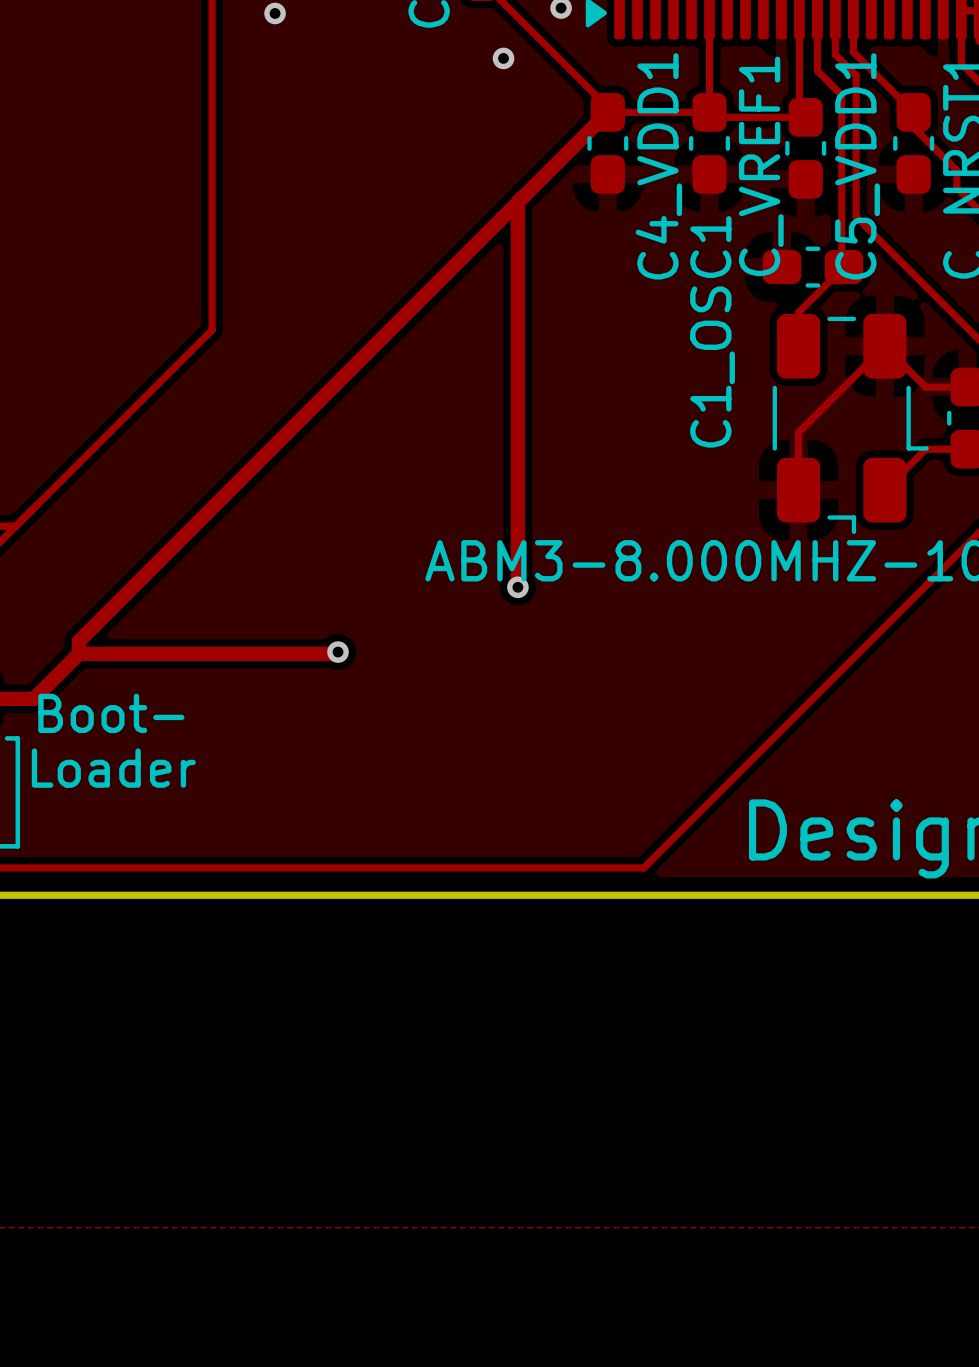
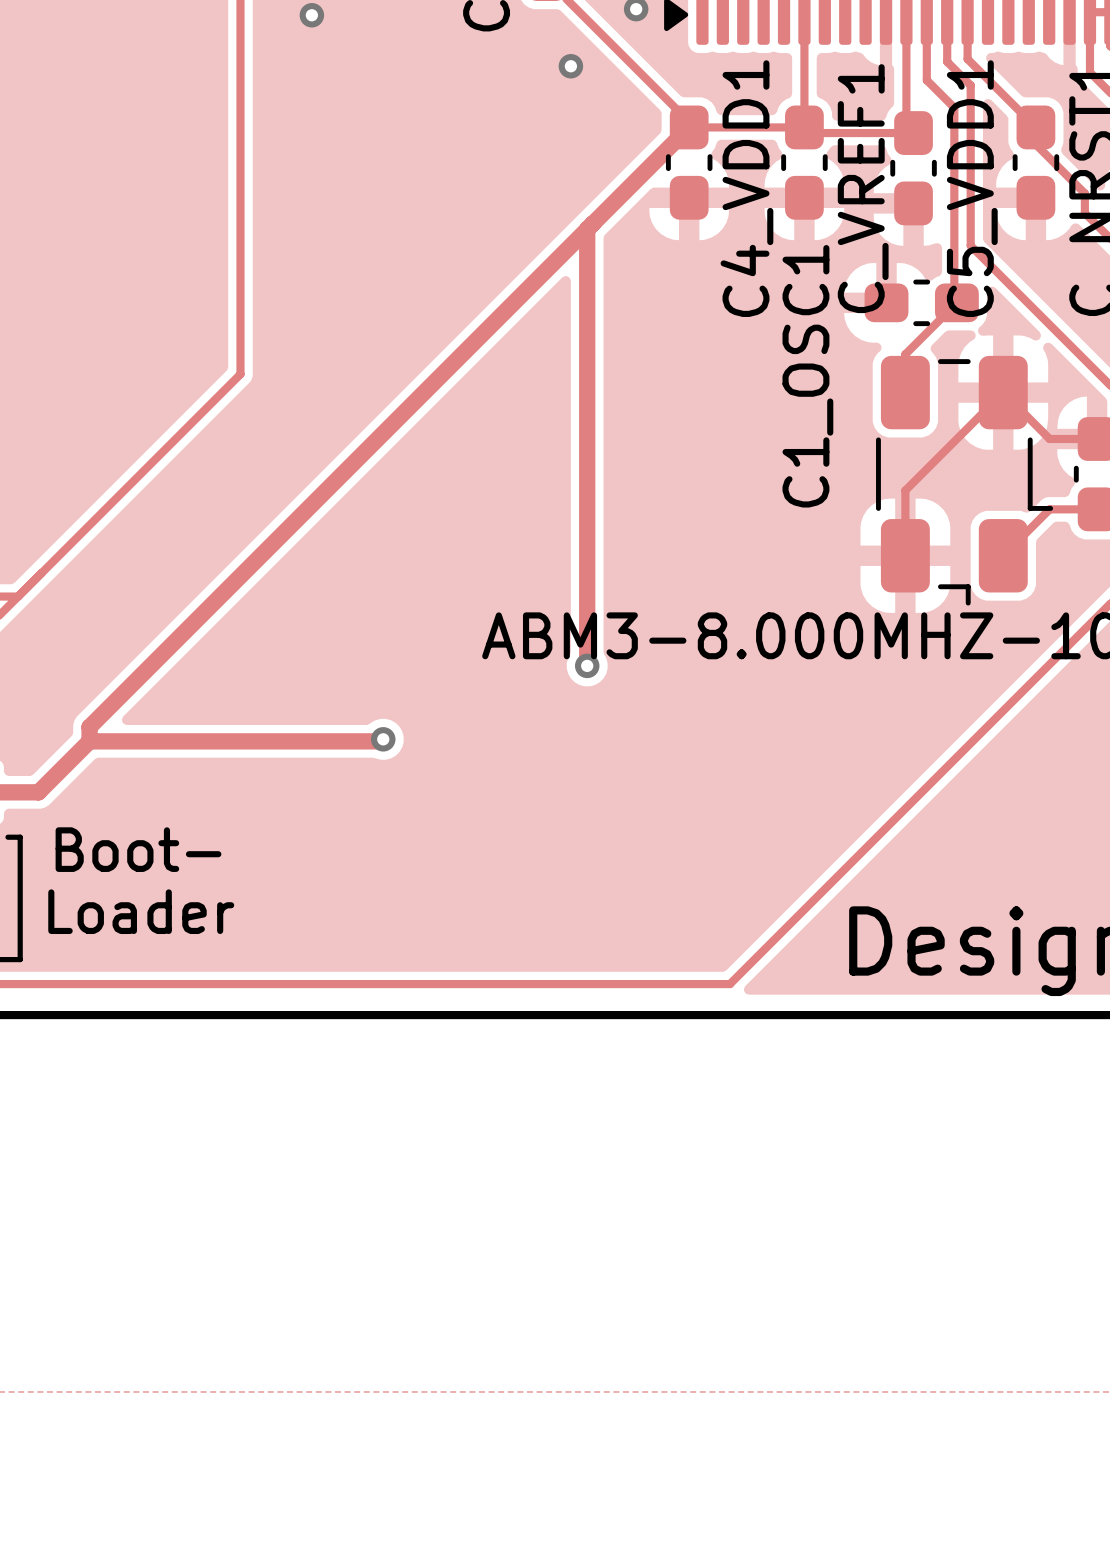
text position: Boot- (111, 713) -> Boot- (138, 849)
text position: Loader (113, 768) -> Loader (141, 911)

